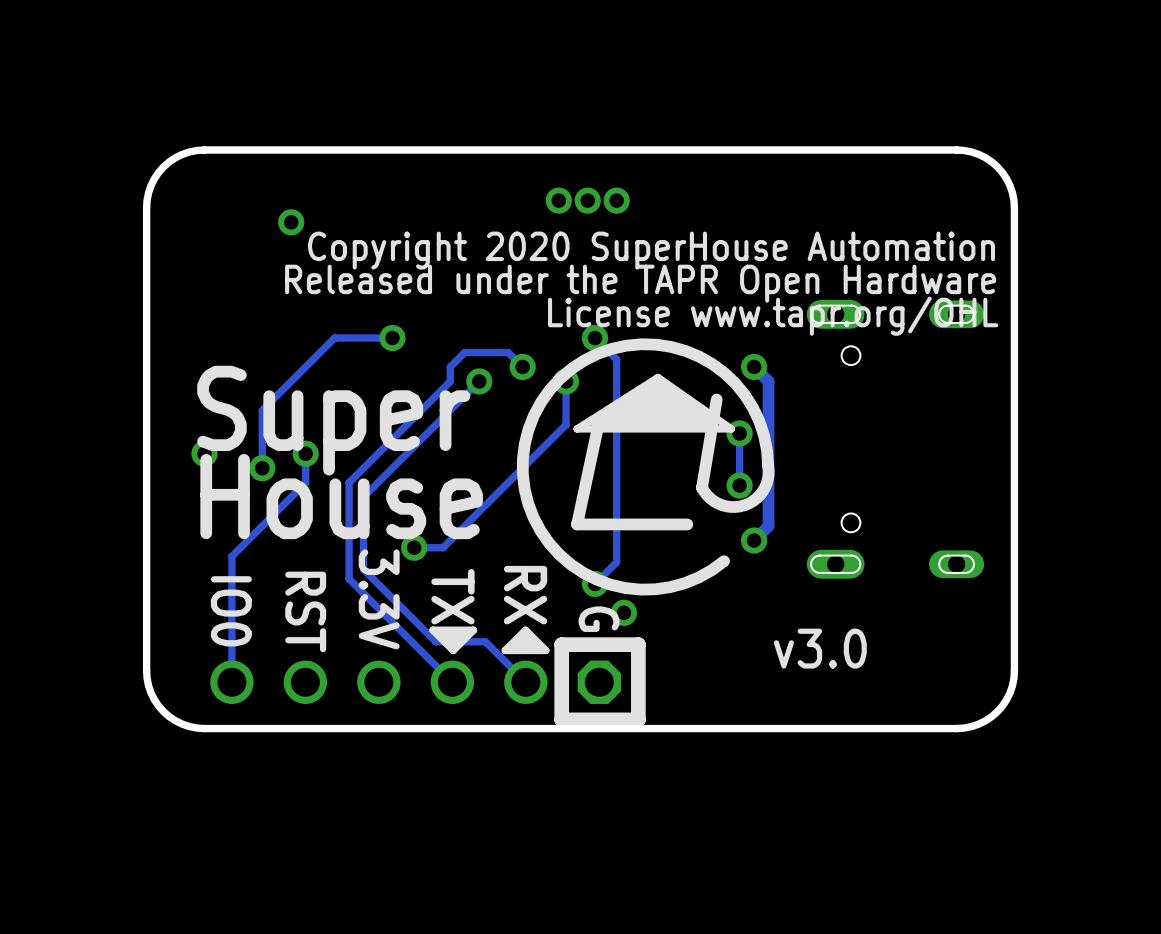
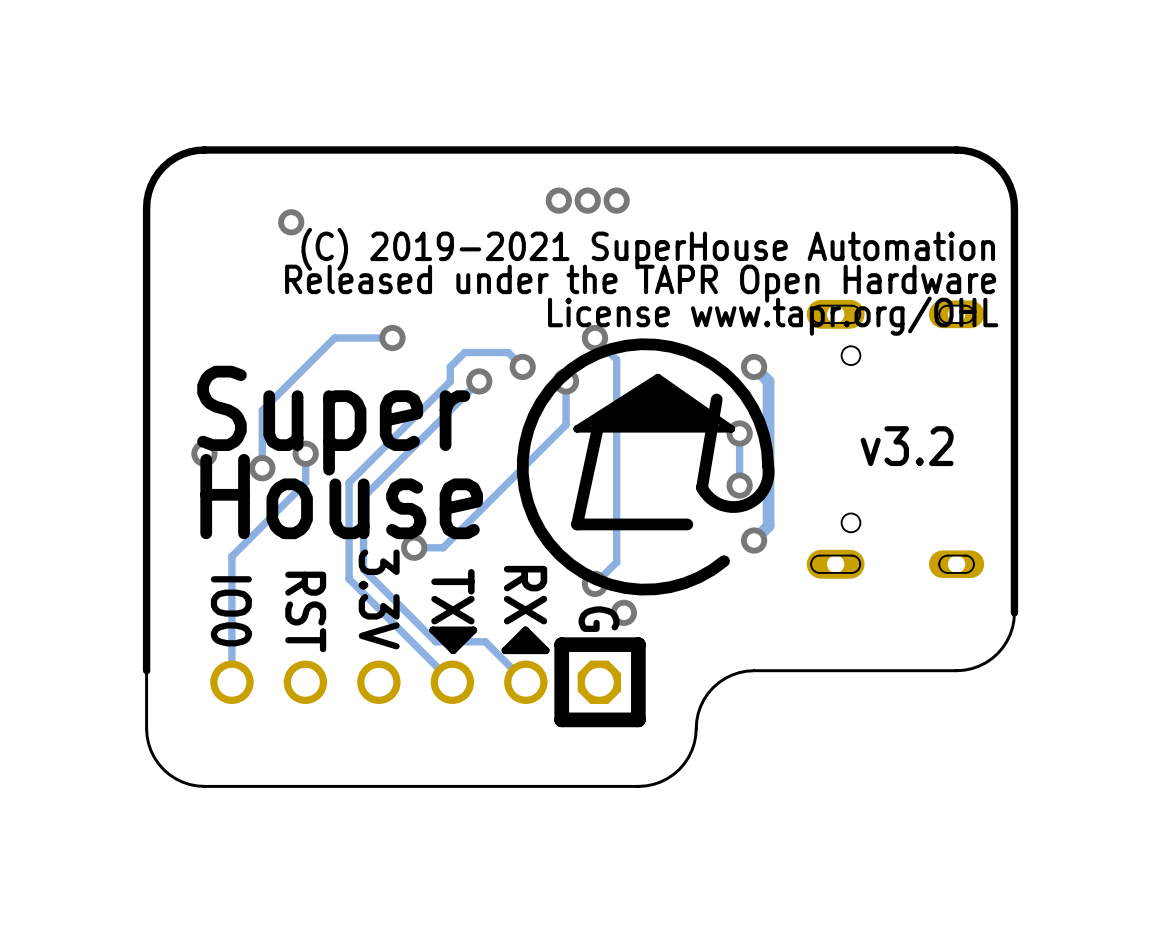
text: Copyright 2020 SuperHouse Automation (651, 250) -> (C) 2019-2021 SuperHouse Automation (648, 249)
text: none -> v3.2 (907, 446)
board edge: (1014, 612) (1014, 670) (1010, 692) (1002, 705) (991, 716) (978, 724) (964, 728) (196, 728) (175, 720) (158, 705) (150, 692) (146, 670) -> (1014, 612) (1010, 634) (1002, 648) (985, 662) (971, 668) (956, 670) (754, 670) (731, 675) (713, 687) (703, 699) (698, 713) (694, 743) (684, 763) (667, 778) (645, 785) (204, 786) (189, 784) (169, 774) (158, 763) (150, 750) (146, 728) (146, 670)
text: v3.0 (820, 648) -> none

